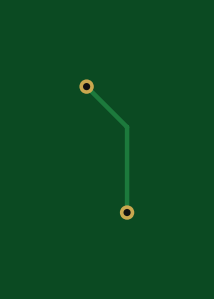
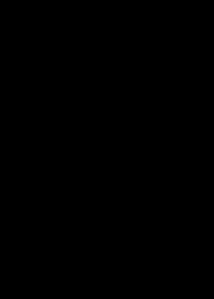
track: (86, 86) (127, 127) (127, 212) -> none
via: (86, 86) -> none
via: (127, 212) -> none

